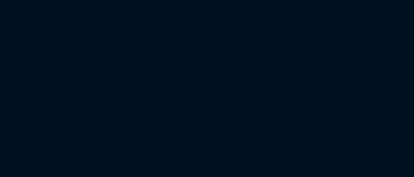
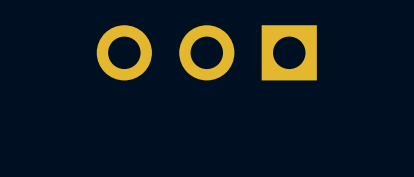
part: none -> (206, 52)

